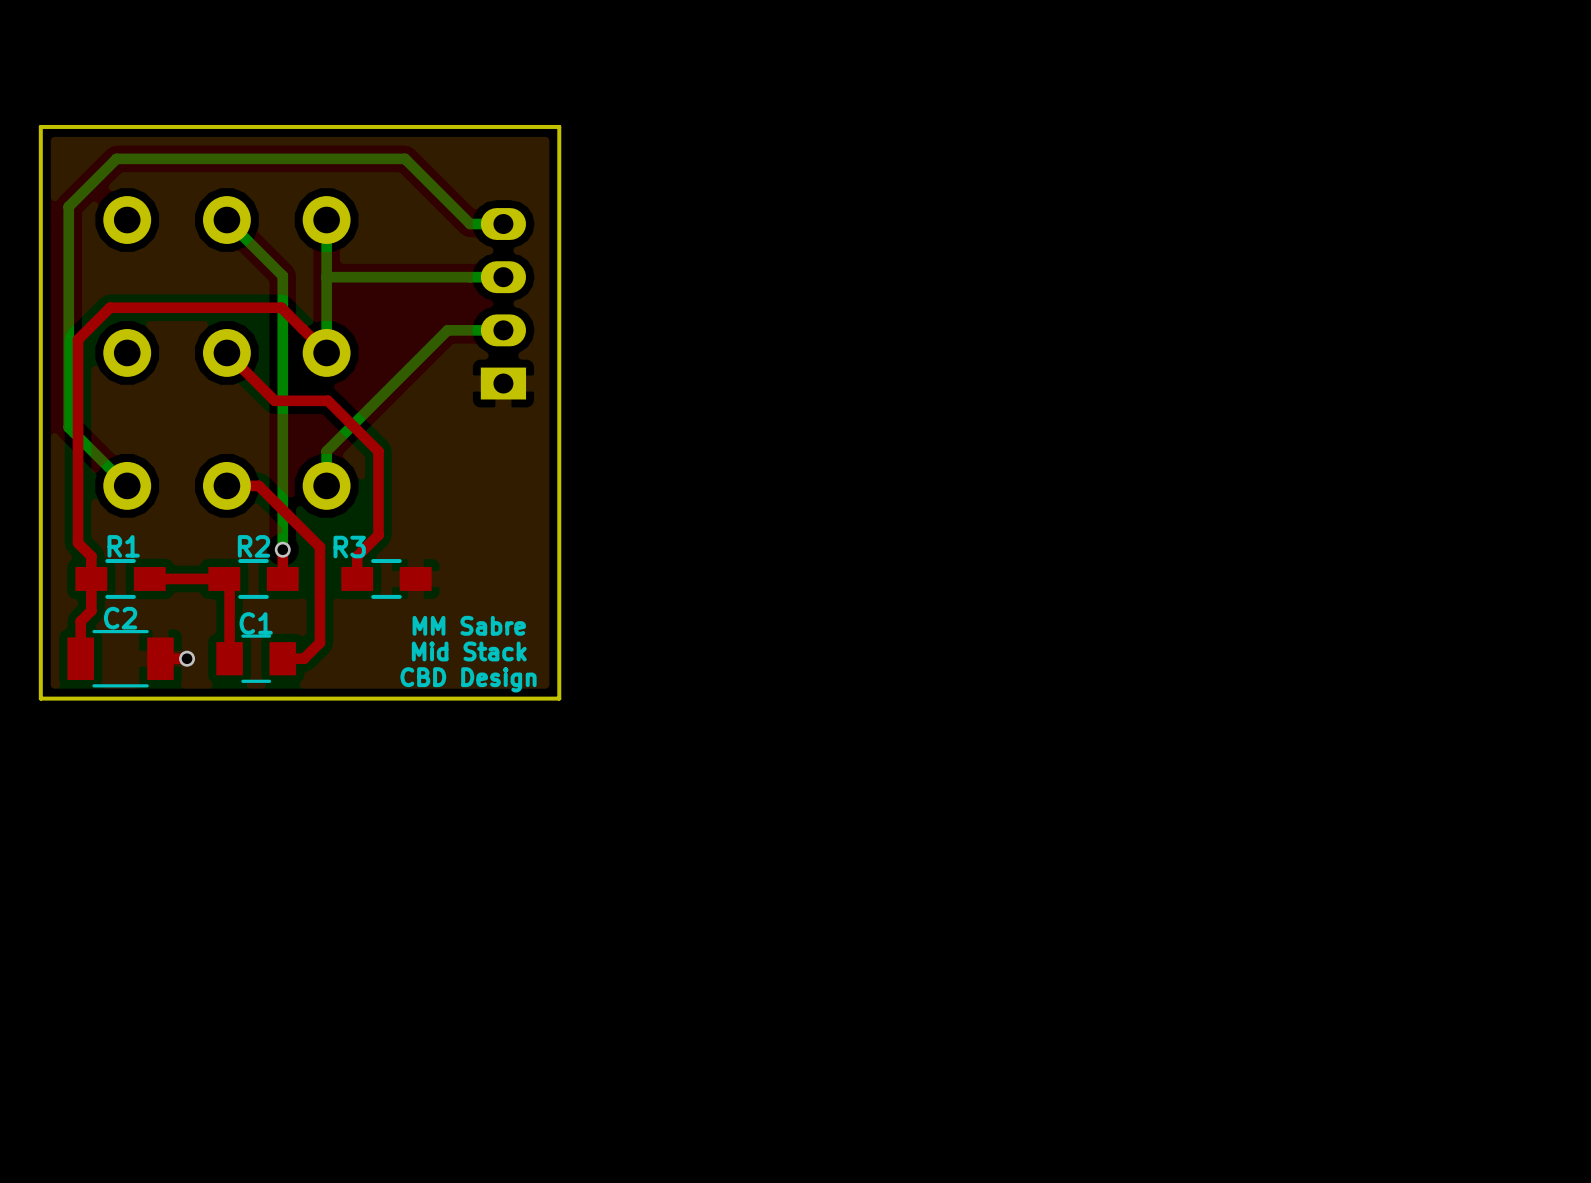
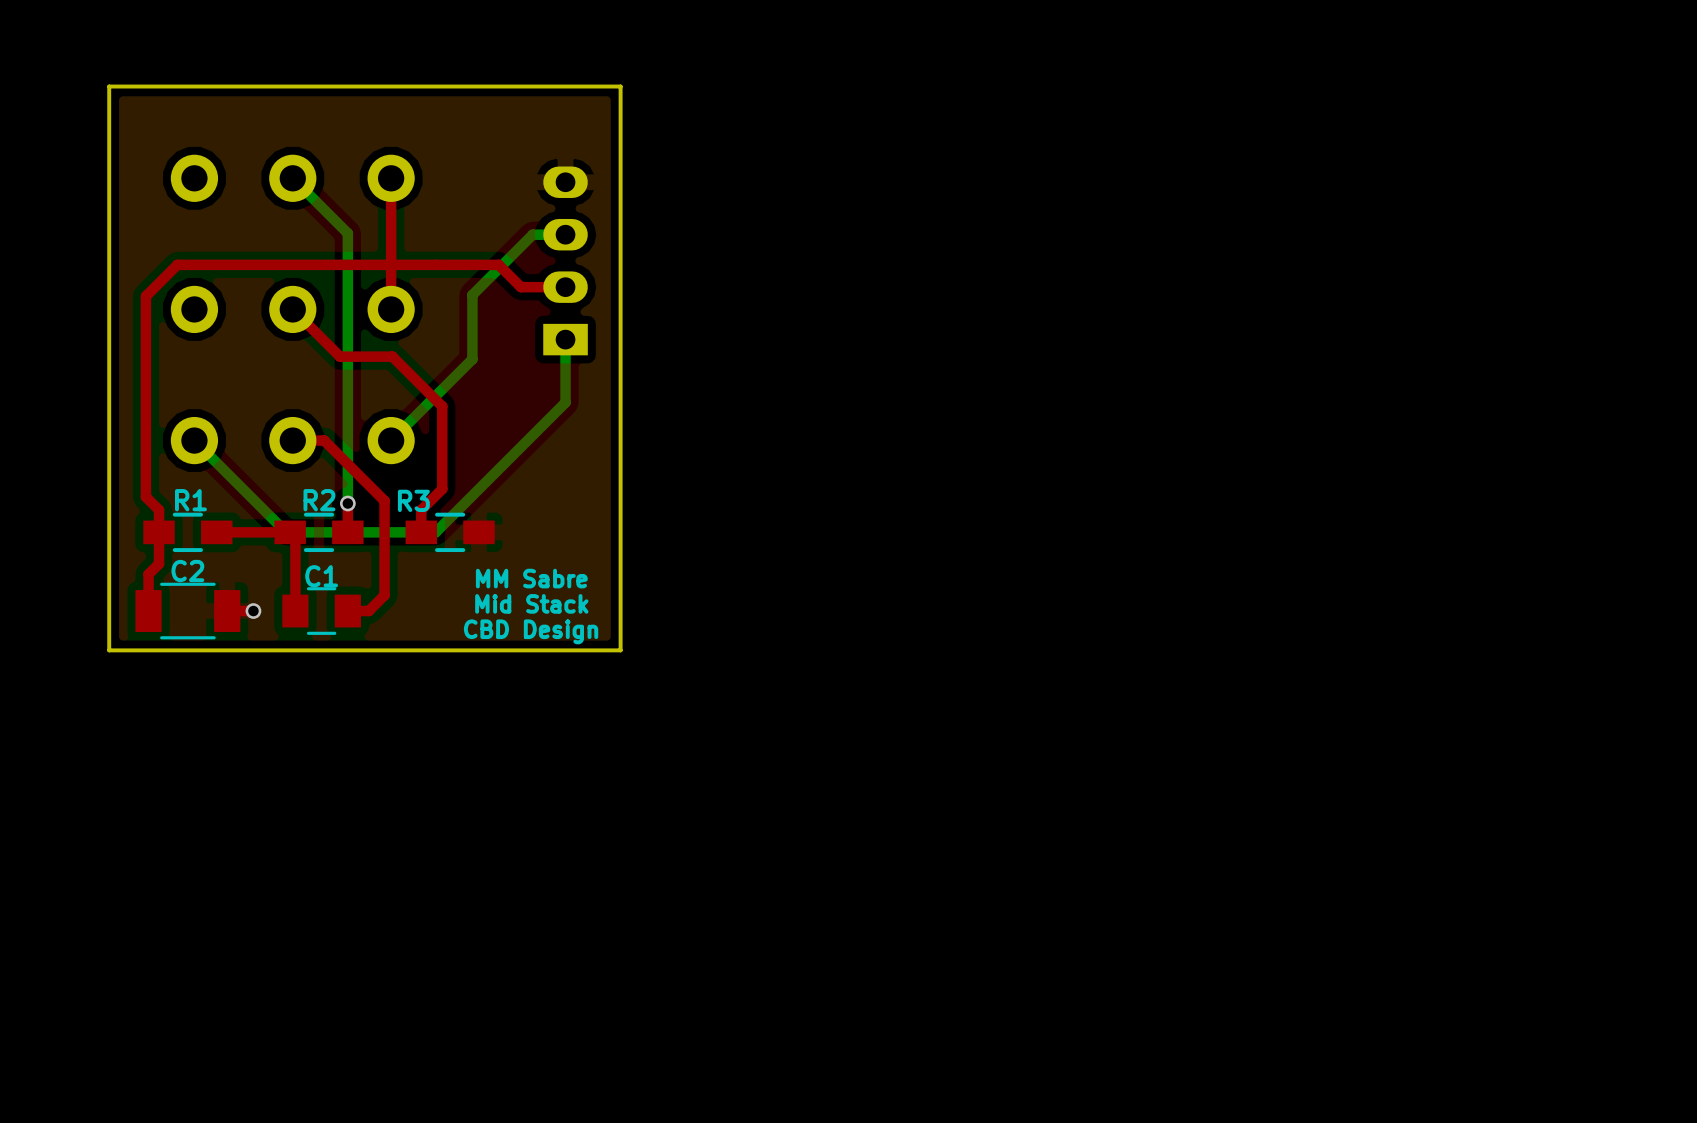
bottom track: (326, 220) (326, 352) -> none
bottom track: (503, 224) (470, 224) (405, 158) (116, 158) (68, 206) (68, 427) (127, 485) -> (565, 339) (565, 402) (435, 532) (286, 532) (194, 440)
bottom track: (326, 277) (470, 277) -> none
top track: (281, 307) (326, 352) -> (391, 178) (391, 309)
top track: none -> (346, 264) (498, 264) (520, 287) (565, 287)
bottom track: (503, 330) (447, 330) (326, 451) (326, 485) -> (532, 234) (472, 295) (472, 359) (391, 440)

